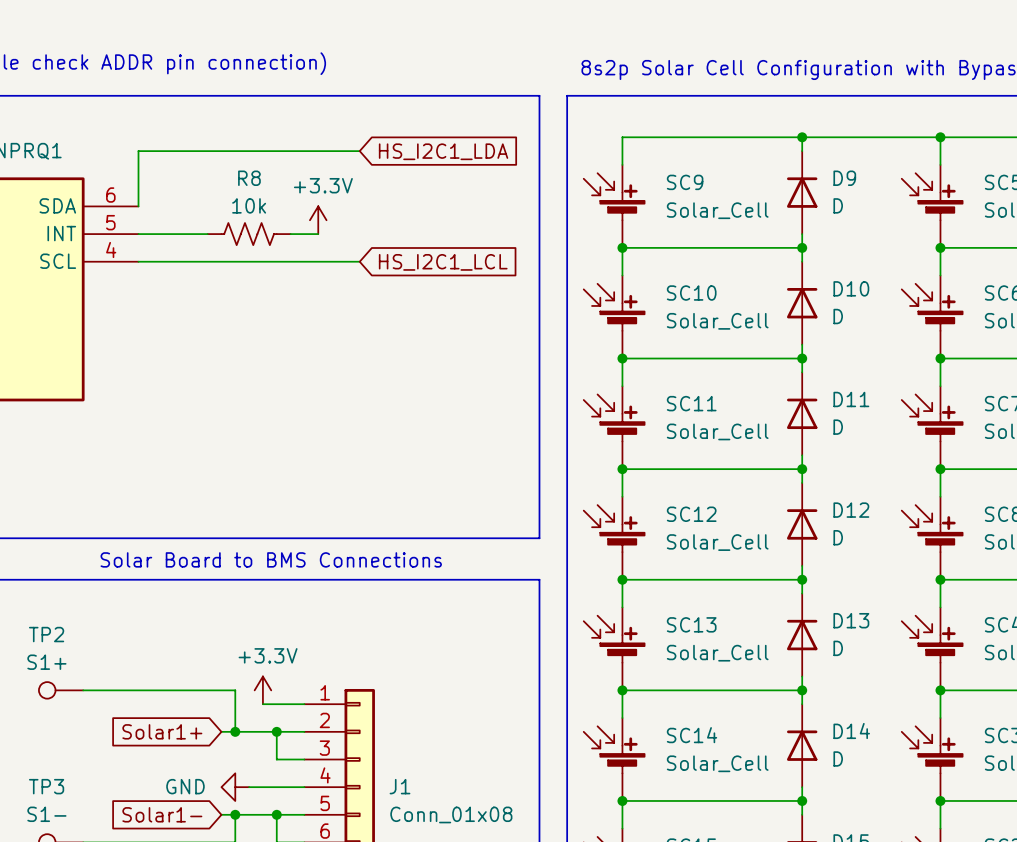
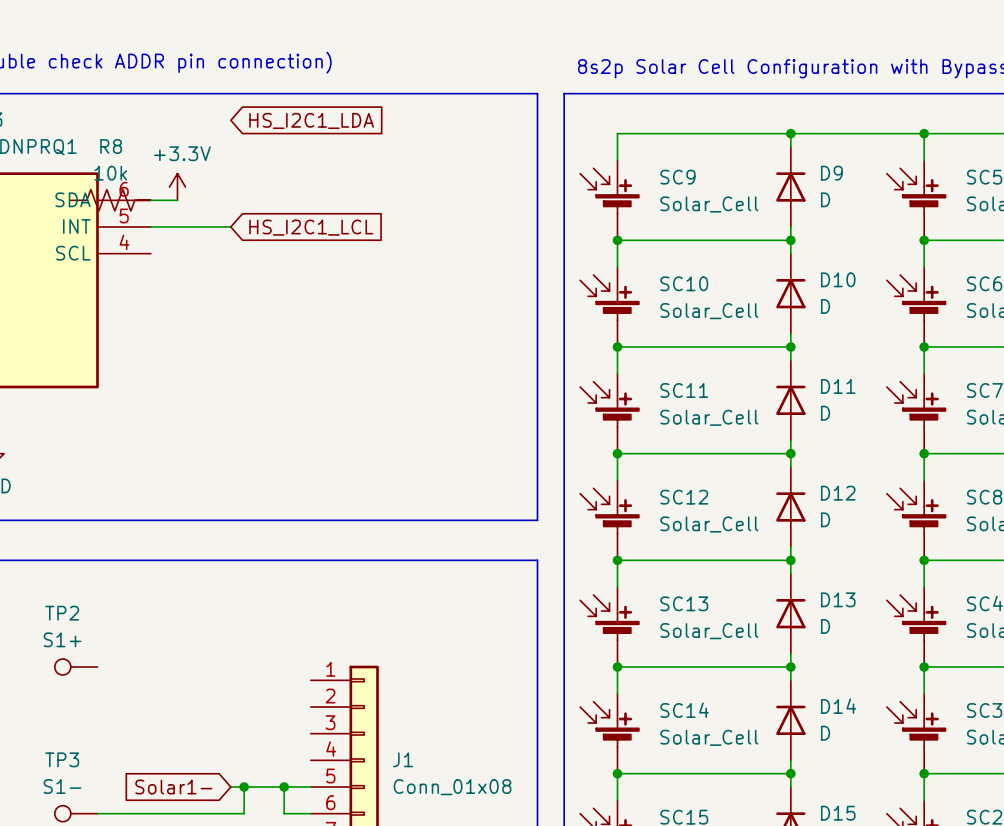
wire: (359, 151) (138, 151) (138, 206) -> (177, 200) (150, 200)
global label position: HS_I2C1_LDA (443, 151) -> HS_I2C1_LDA (311, 120)
power symbol position: +3.3V (318, 220) -> +3.3V (177, 186)
R8 position: (249, 234) -> (110, 200)
wire: (290, 234) (318, 234) -> none
wire: (138, 261) (359, 261) -> none
global label position: HS_I2C1_LCL (443, 262) -> HS_I2C1_LCL (311, 227)
text: Solar Board to BMS Connections (271, 559) -> none
wire: (83, 690) (235, 690) (235, 731) -> none
power symbol: +3.3V (262, 690) -> none
wire: (262, 704) (304, 704) -> none
global label: Solar1+ (162, 731) -> none
wire: (221, 731) (304, 731) -> none
junction: (235, 731) -> none
wire: (276, 731) (276, 759) (304, 759) -> none
junction: (276, 731) -> none
power symbol: GND (235, 787) -> none
wire: (249, 787) (304, 787) -> none

